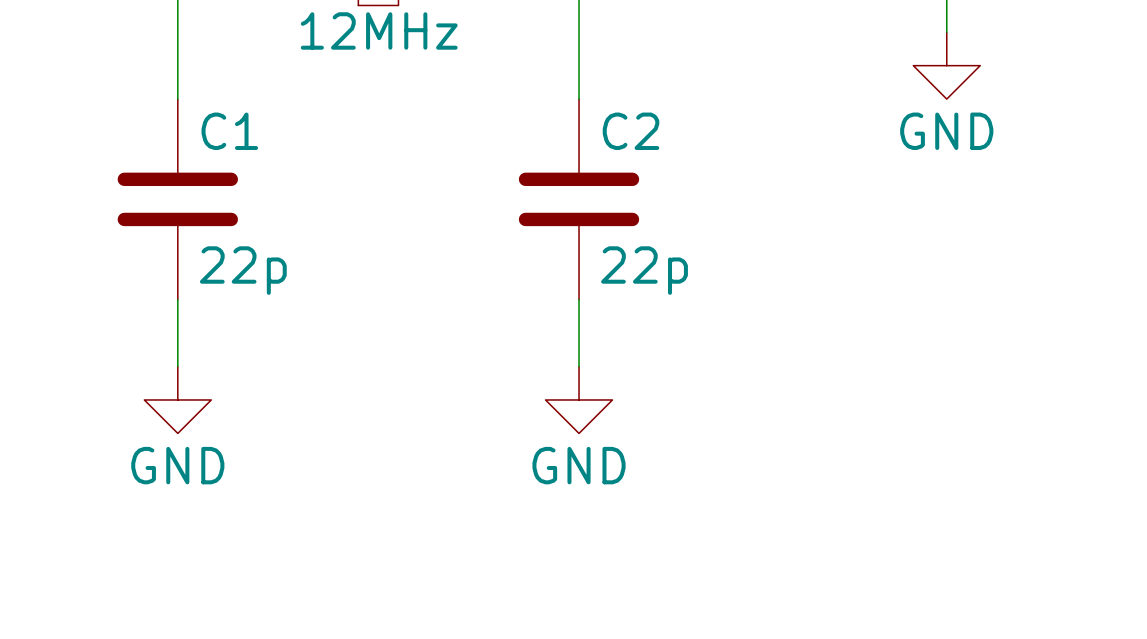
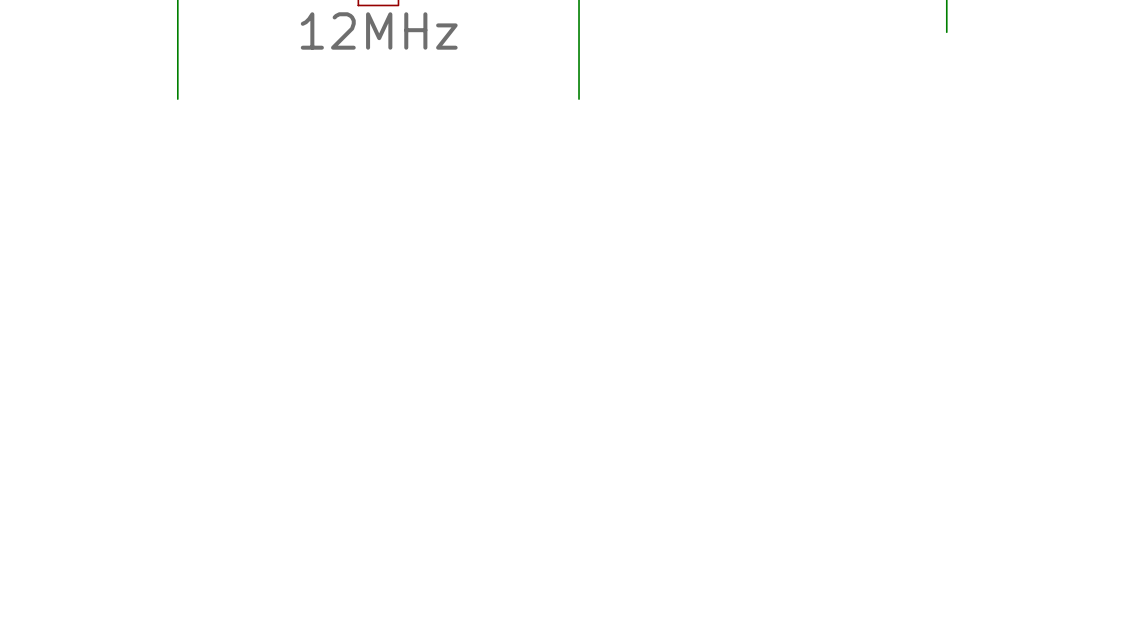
power symbol: GND (946, 65) -> none
C1: 22p (177, 199) -> none
C2: 22p (579, 199) -> none
wire: (177, 299) (177, 366) -> none
wire: (579, 299) (579, 366) -> none
power symbol: GND (177, 399) -> none
power symbol: GND (579, 399) -> none

